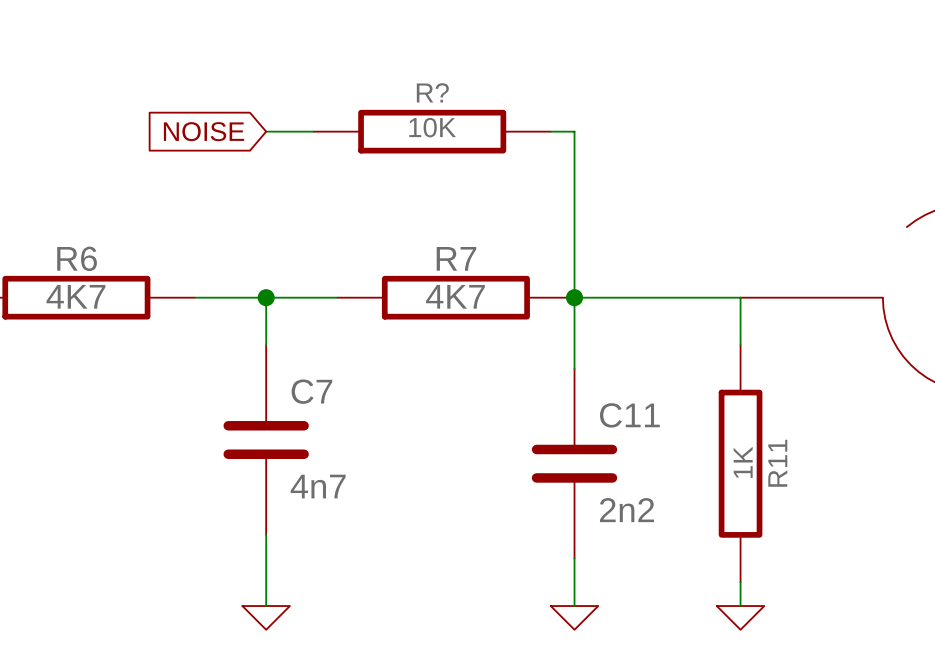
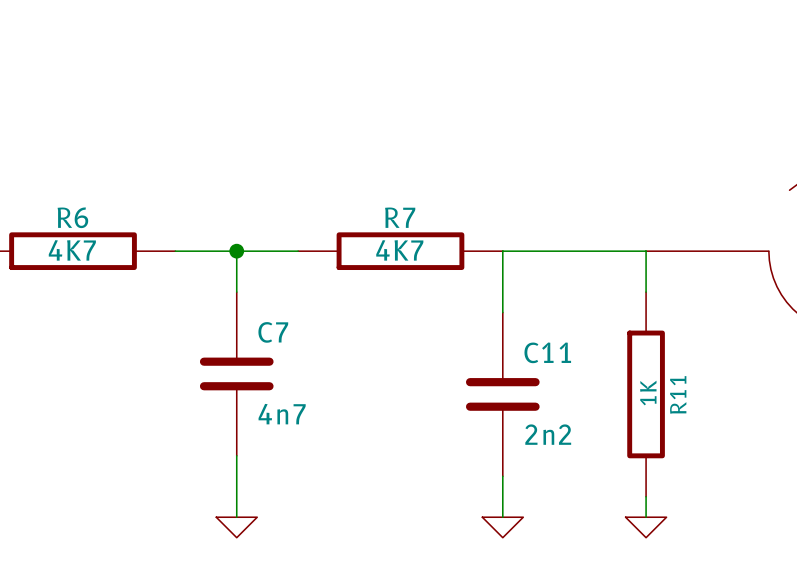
global label: NOISE (204, 131) -> none
wire: (266, 131) (313, 131) -> none
R?: 10K (432, 131) -> none
wire: (550, 131) (574, 131) (574, 297) -> none
junction: (574, 297) -> none

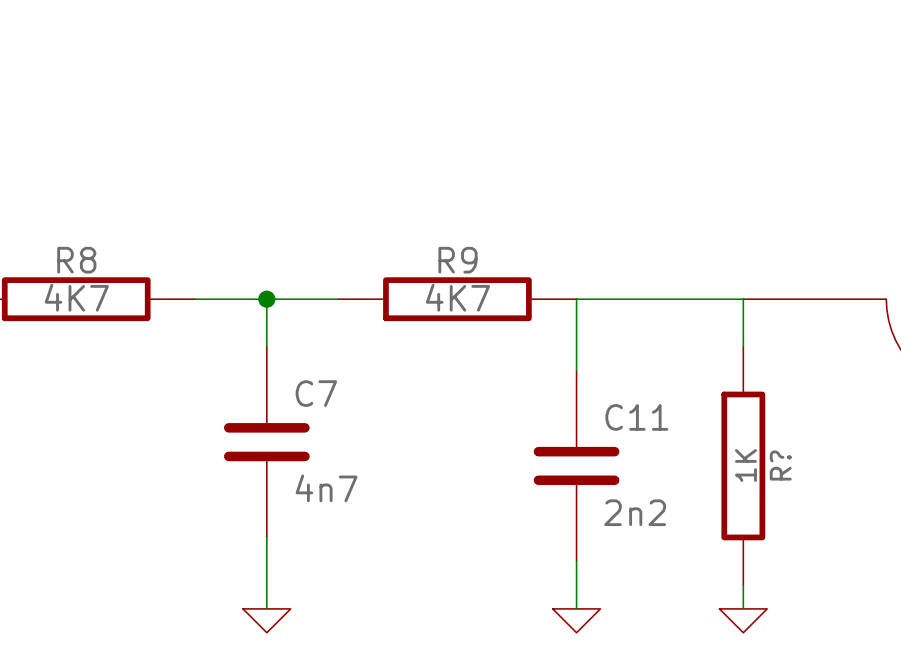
R6 name: R6 (72, 217) -> R8 (76, 260)
R7 name: R7 (400, 217) -> R9 (458, 260)
R11 name: R11 (678, 394) -> R? (780, 465)

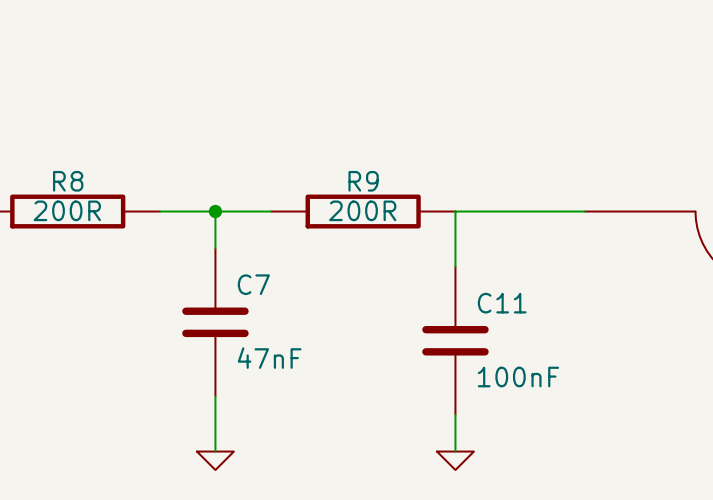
R8 value: 4K7 (76, 297) -> 200R (67, 210)
R9 value: 4K7 (458, 297) -> 200R (362, 210)
wire: (743, 299) (743, 346) -> none
R?: 1K (743, 465) -> none
C7 value: 4n7 (326, 488) -> 47nF (269, 358)
C11 value: 2n2 (635, 512) -> 100nF (518, 377)
wire: (743, 585) (743, 608) -> none
power symbol: (743, 620) -> none

